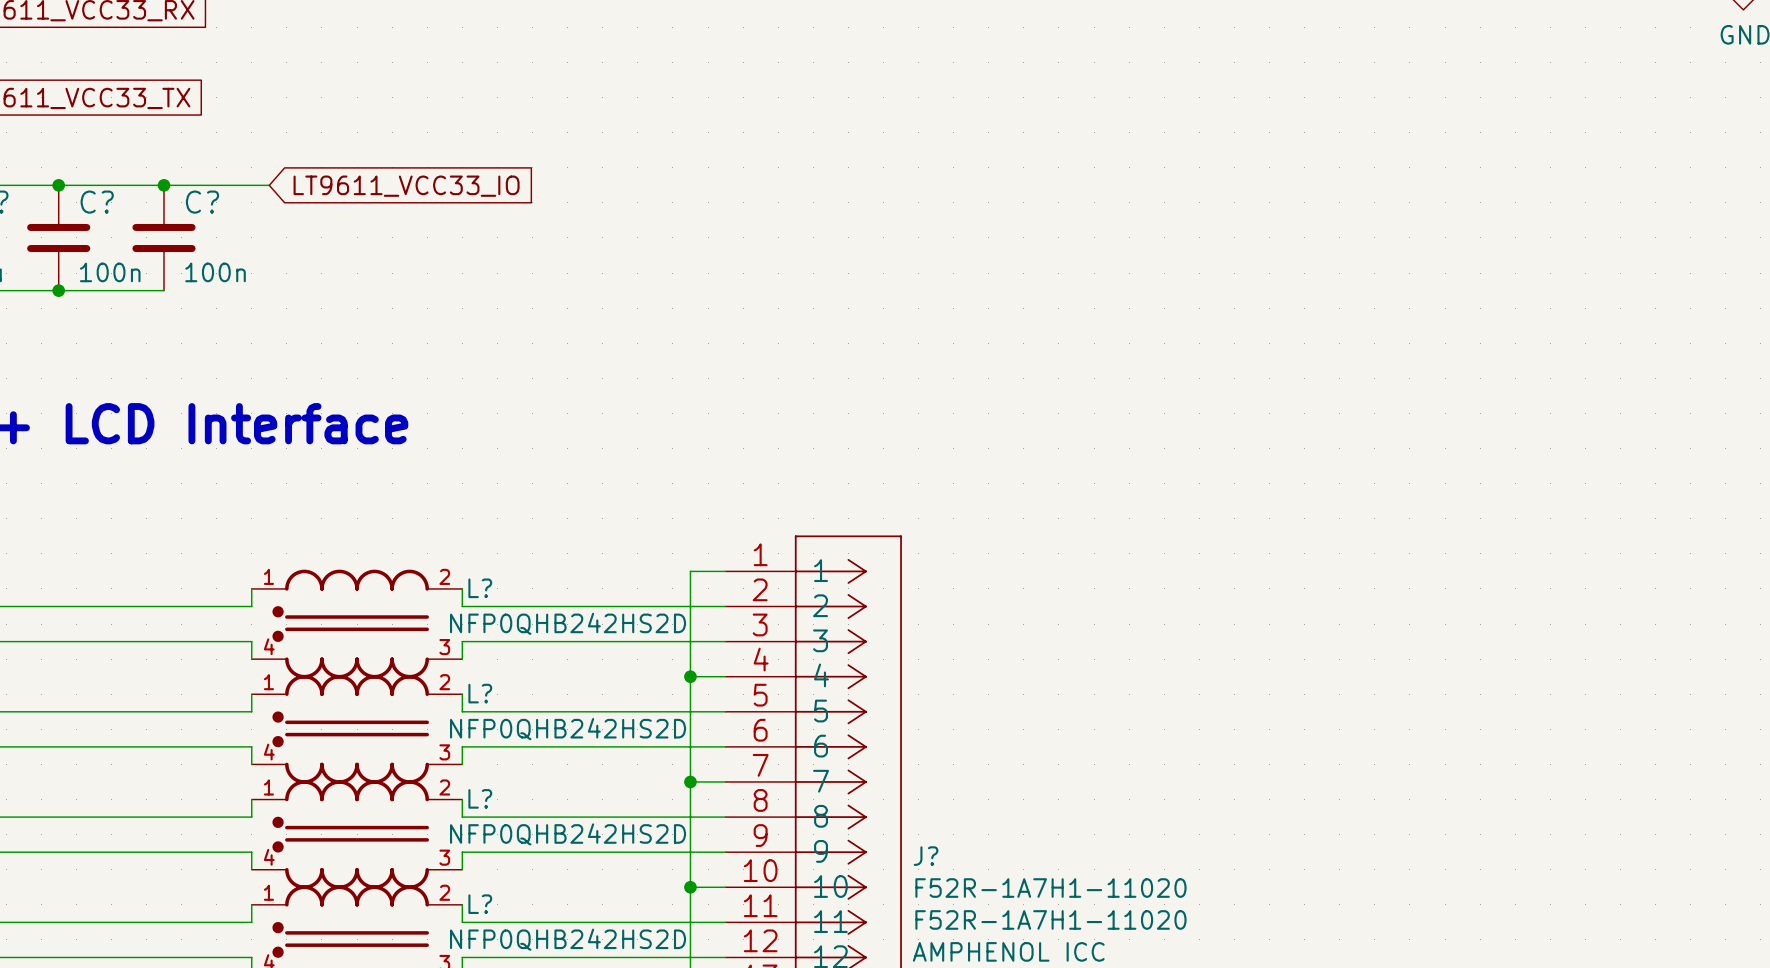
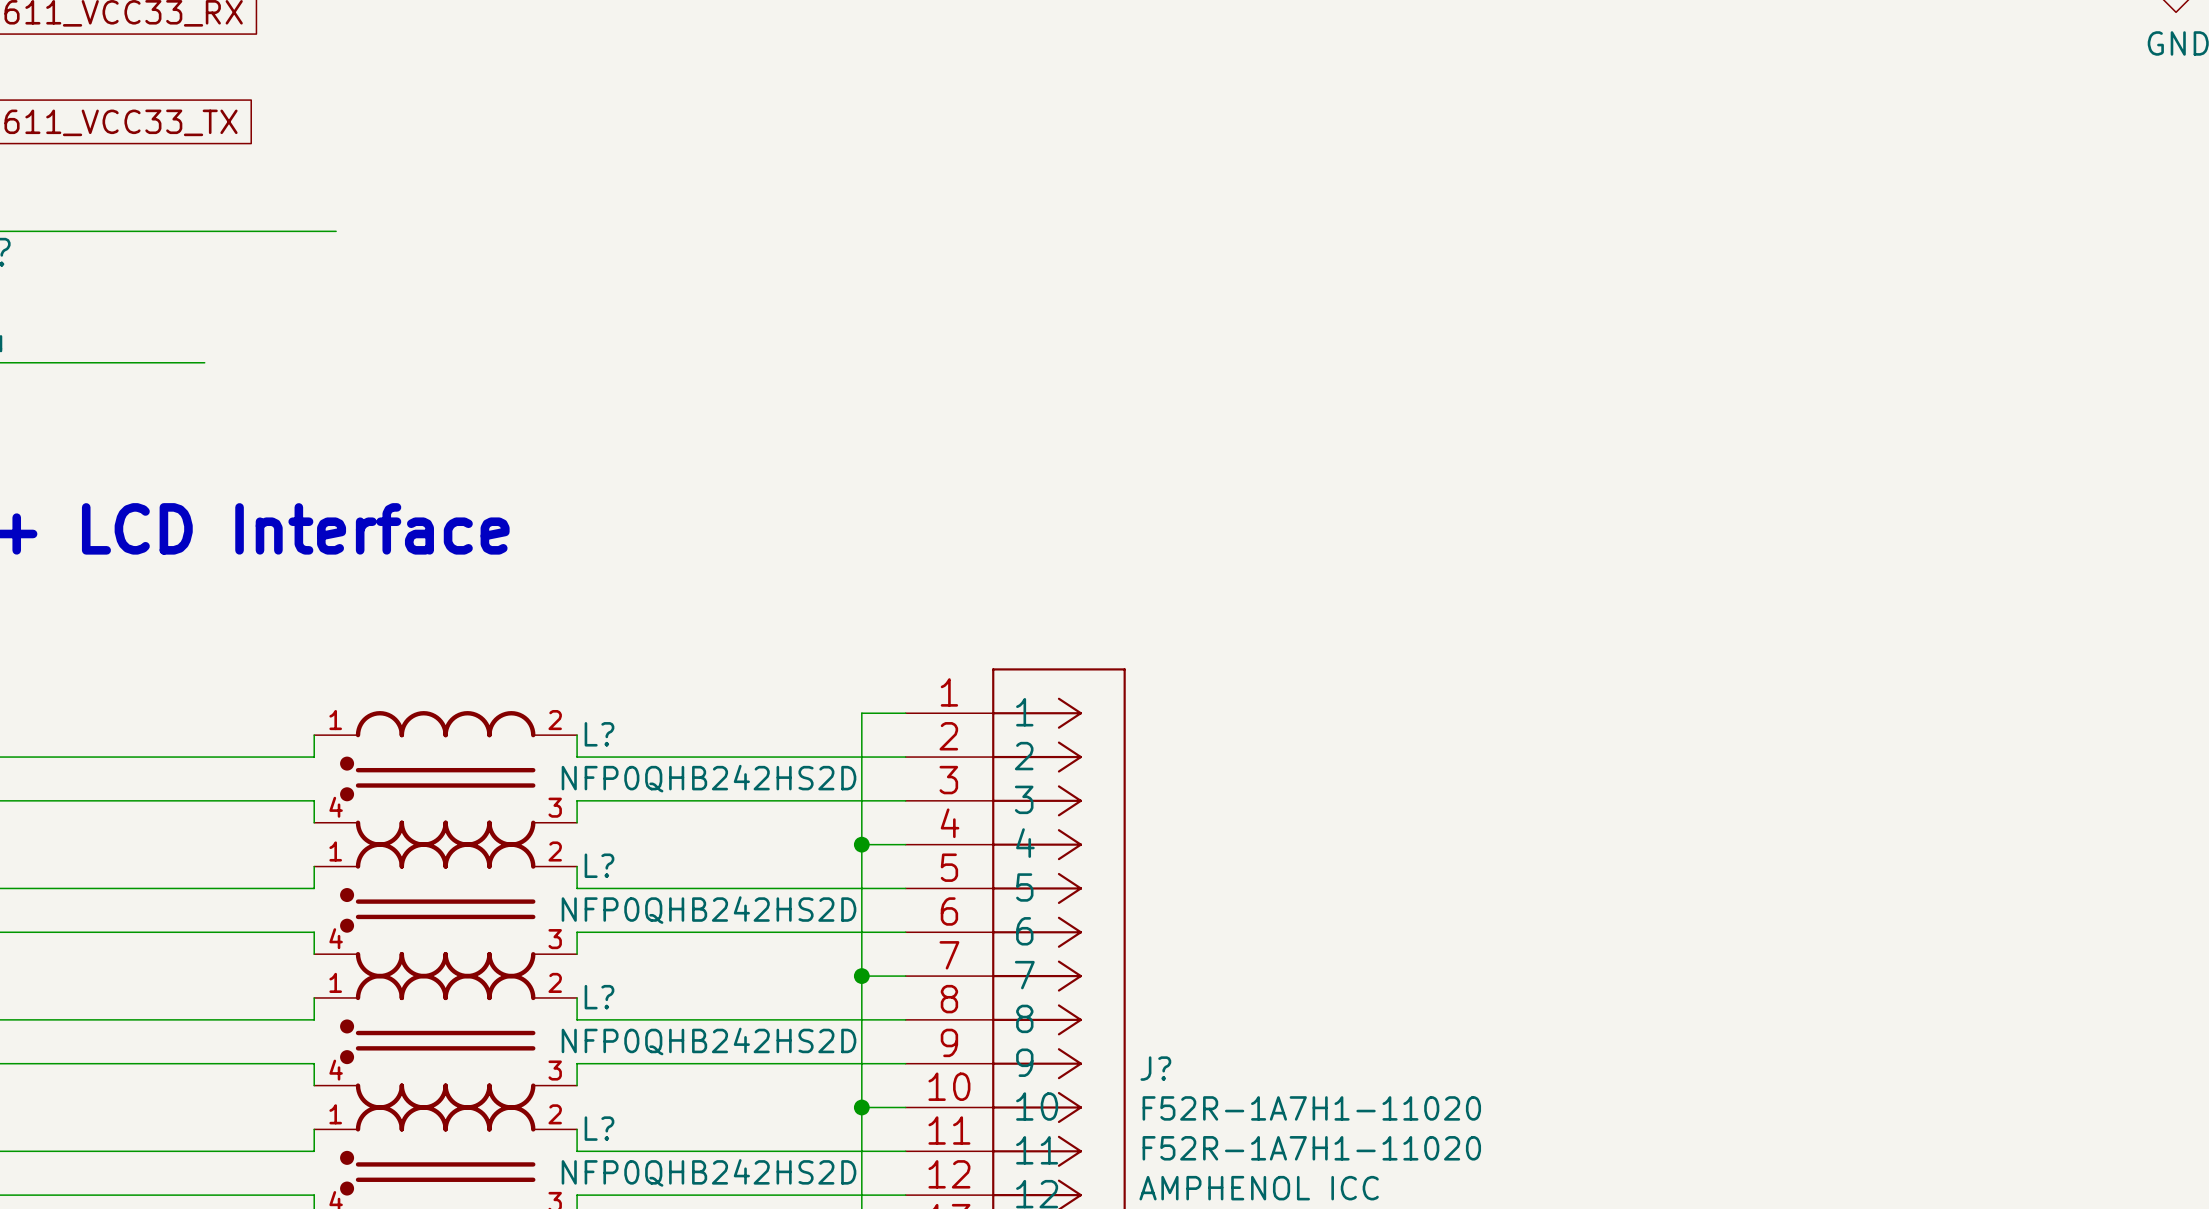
junction: (58, 185) -> none
junction: (163, 185) -> none
global label: LT9611_VCC33_IO (406, 186) -> none
C?: (58, 237) -> none
C?: (163, 237) -> none
junction: (58, 290) -> none

